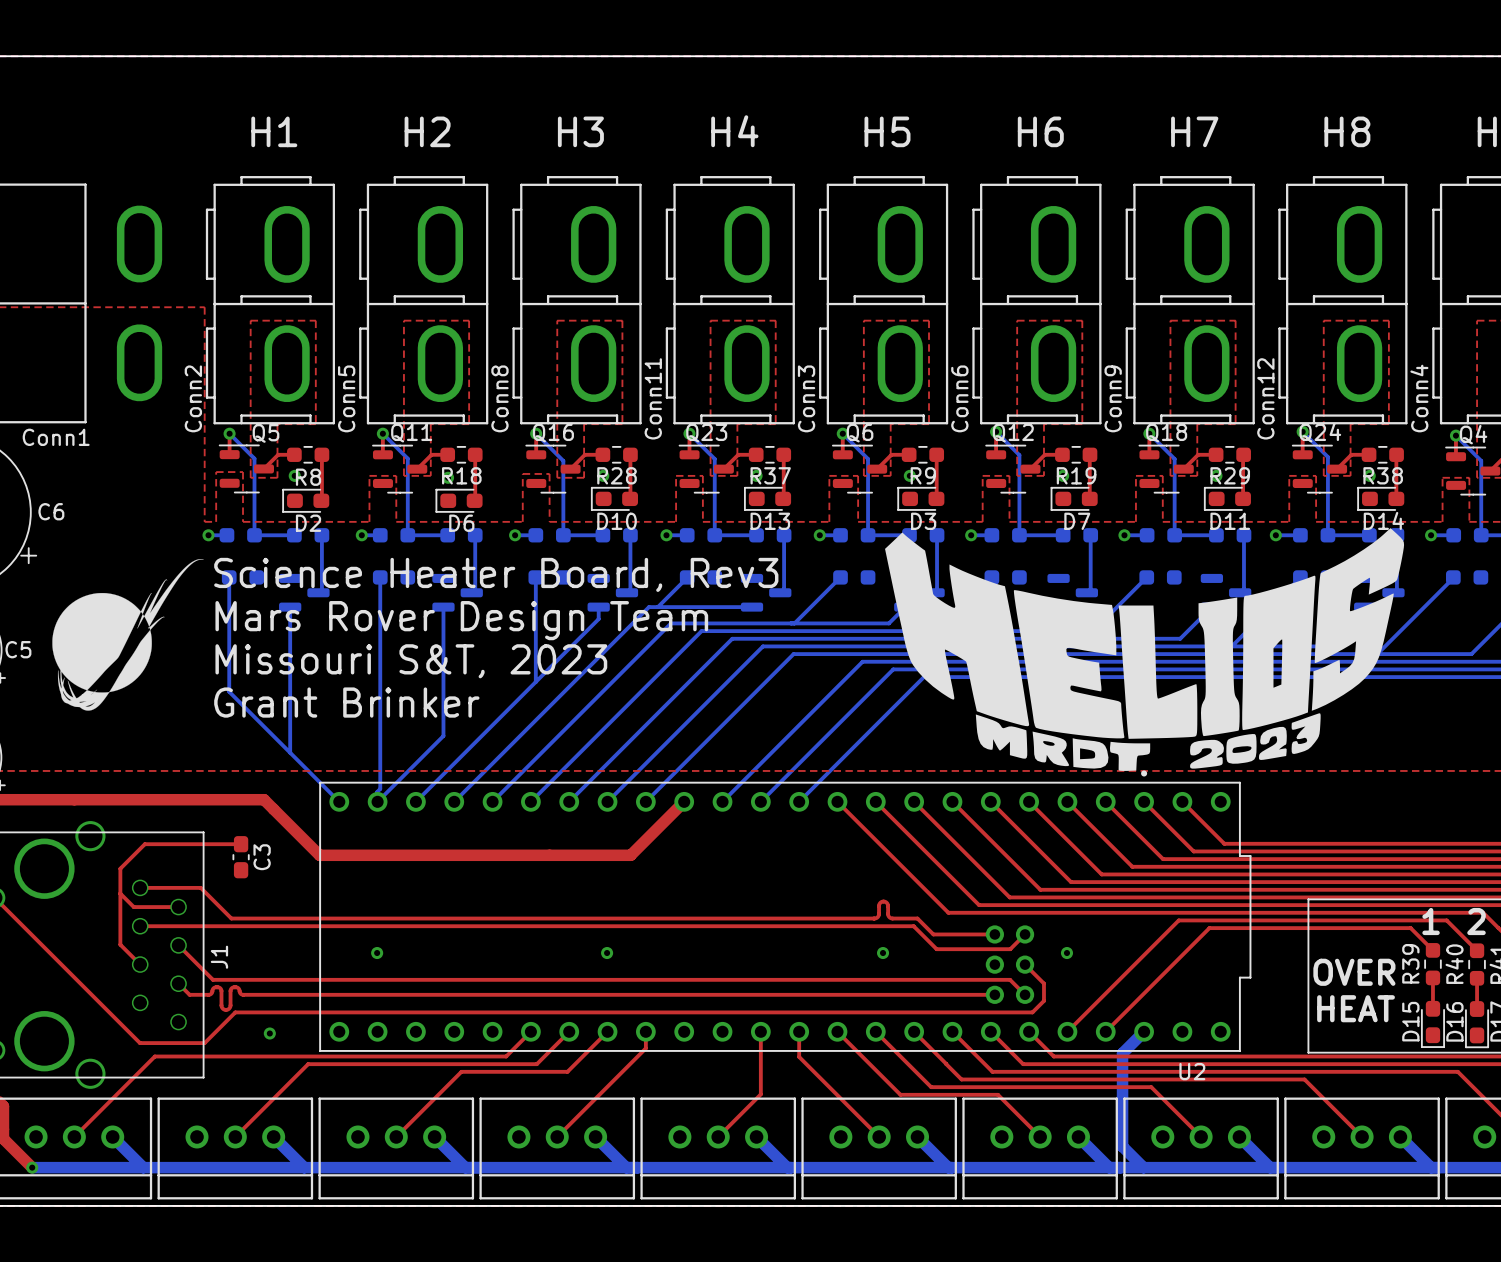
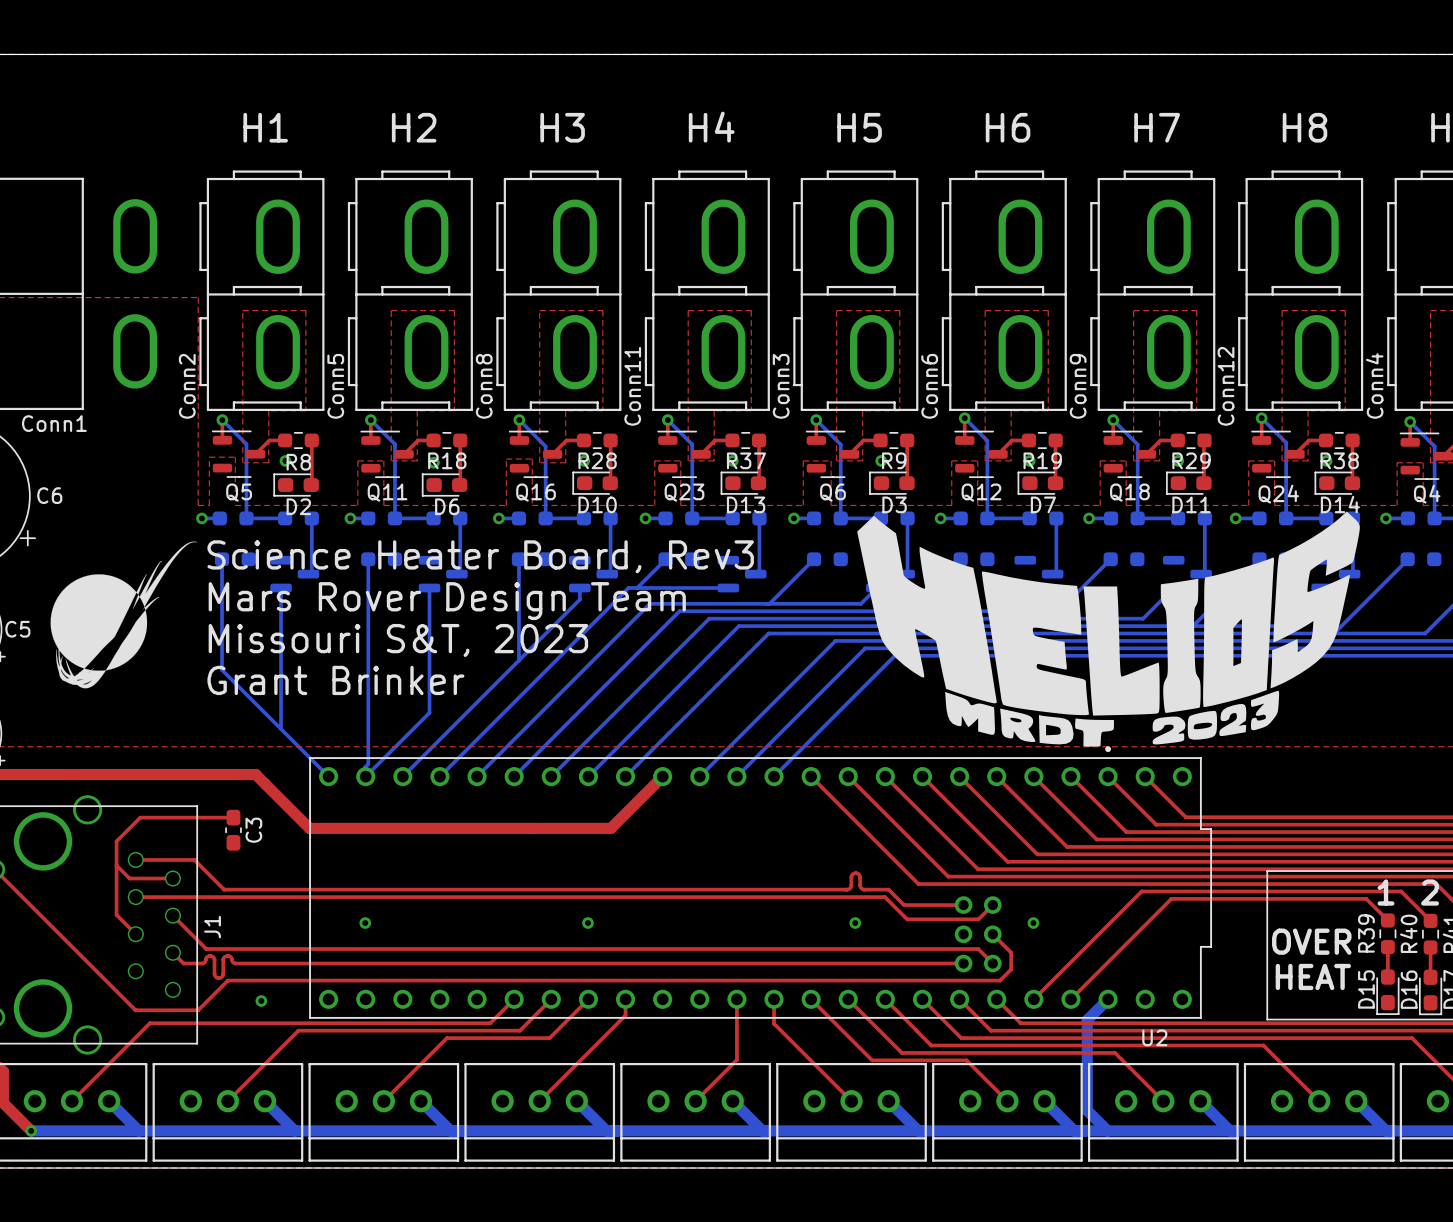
Q24 name position: Q24 (1320, 432) -> Q24 (1278, 494)
Q5 name position: Q5 (265, 433) -> Q5 (239, 492)
Q11 name position: Q11 (411, 433) -> Q11 (387, 492)
Q16 name position: Q16 (553, 433) -> Q16 (536, 492)
Q23 name position: Q23 (706, 433) -> Q23 (684, 492)
Q6 name position: Q6 (860, 433) -> Q6 (832, 492)
Q12 name position: Q12 (1013, 433) -> Q12 (981, 492)
Q18 name position: Q18 (1166, 433) -> Q18 (1129, 492)
Q4 name position: Q4 (1473, 434) -> Q4 (1427, 494)

